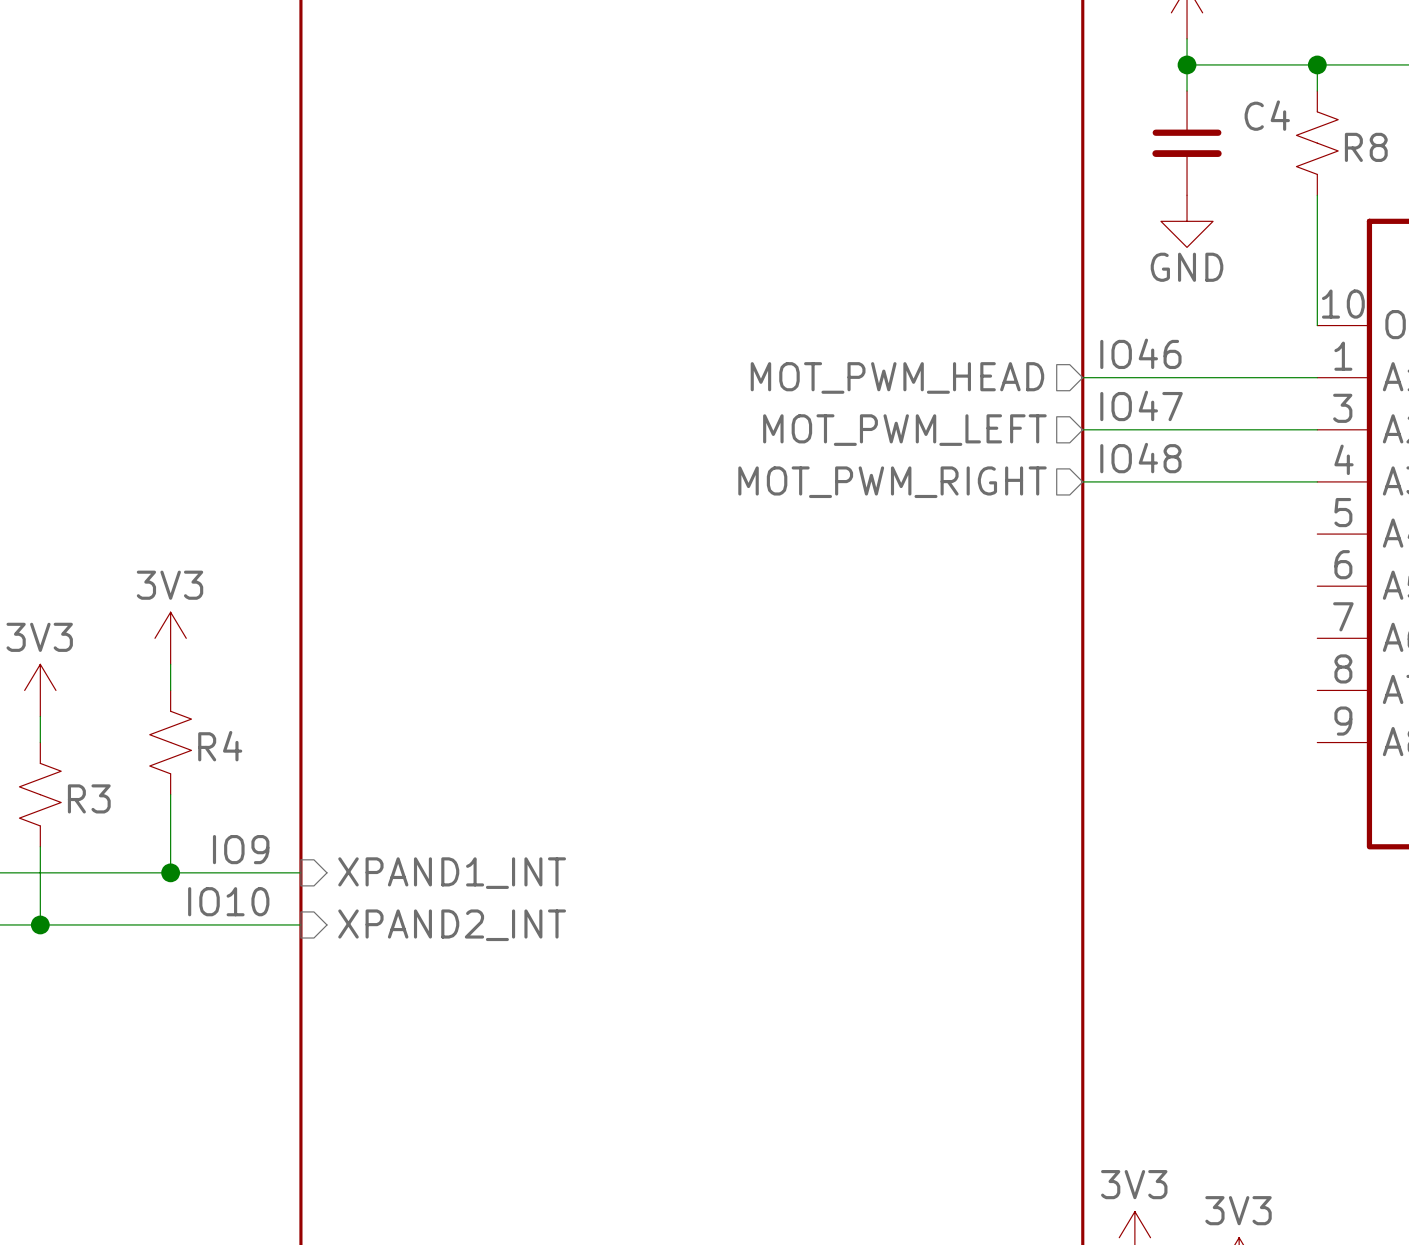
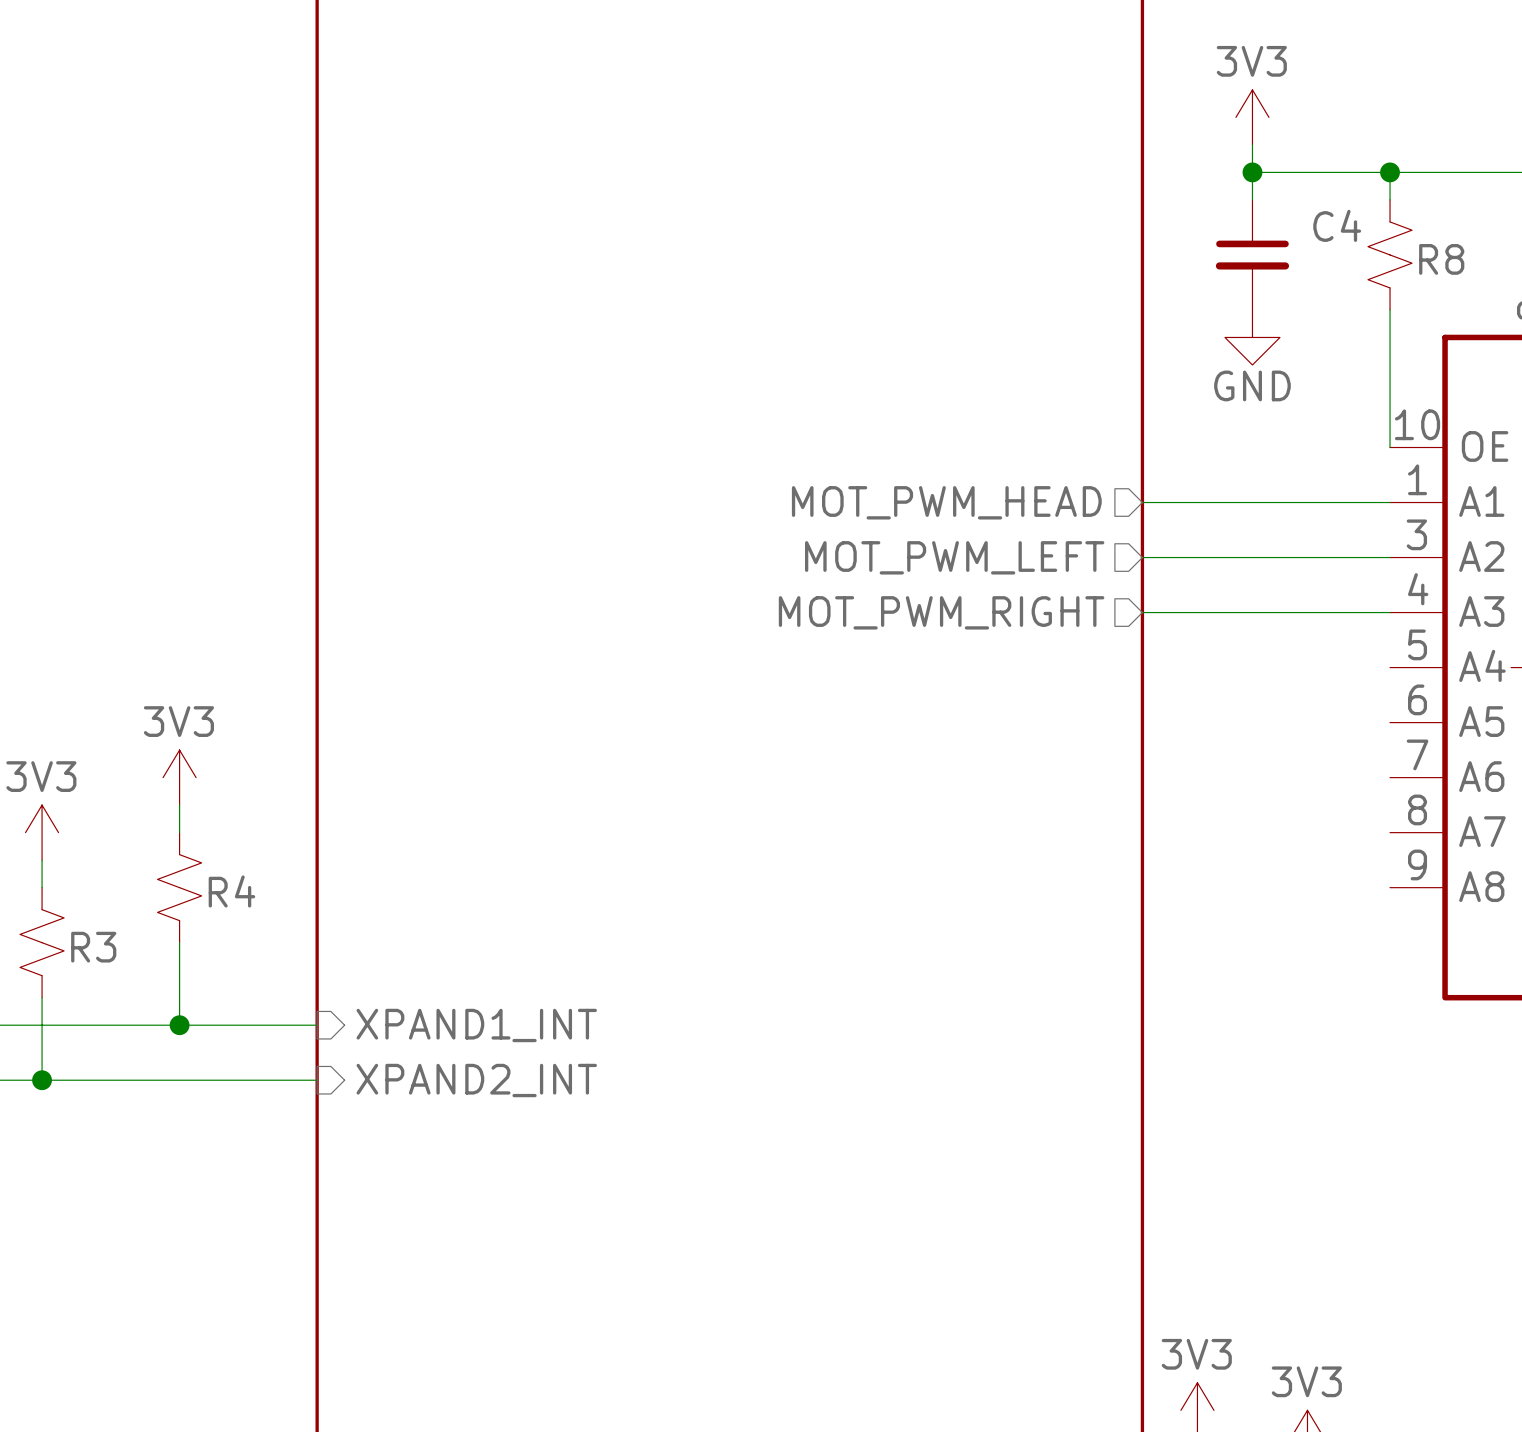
label: IO46 (1140, 353) -> none
label: IO47 (1141, 405) -> none
label: IO48 (1140, 458) -> none
label: IO9 (241, 849) -> none
label: IO10 (228, 901) -> none

